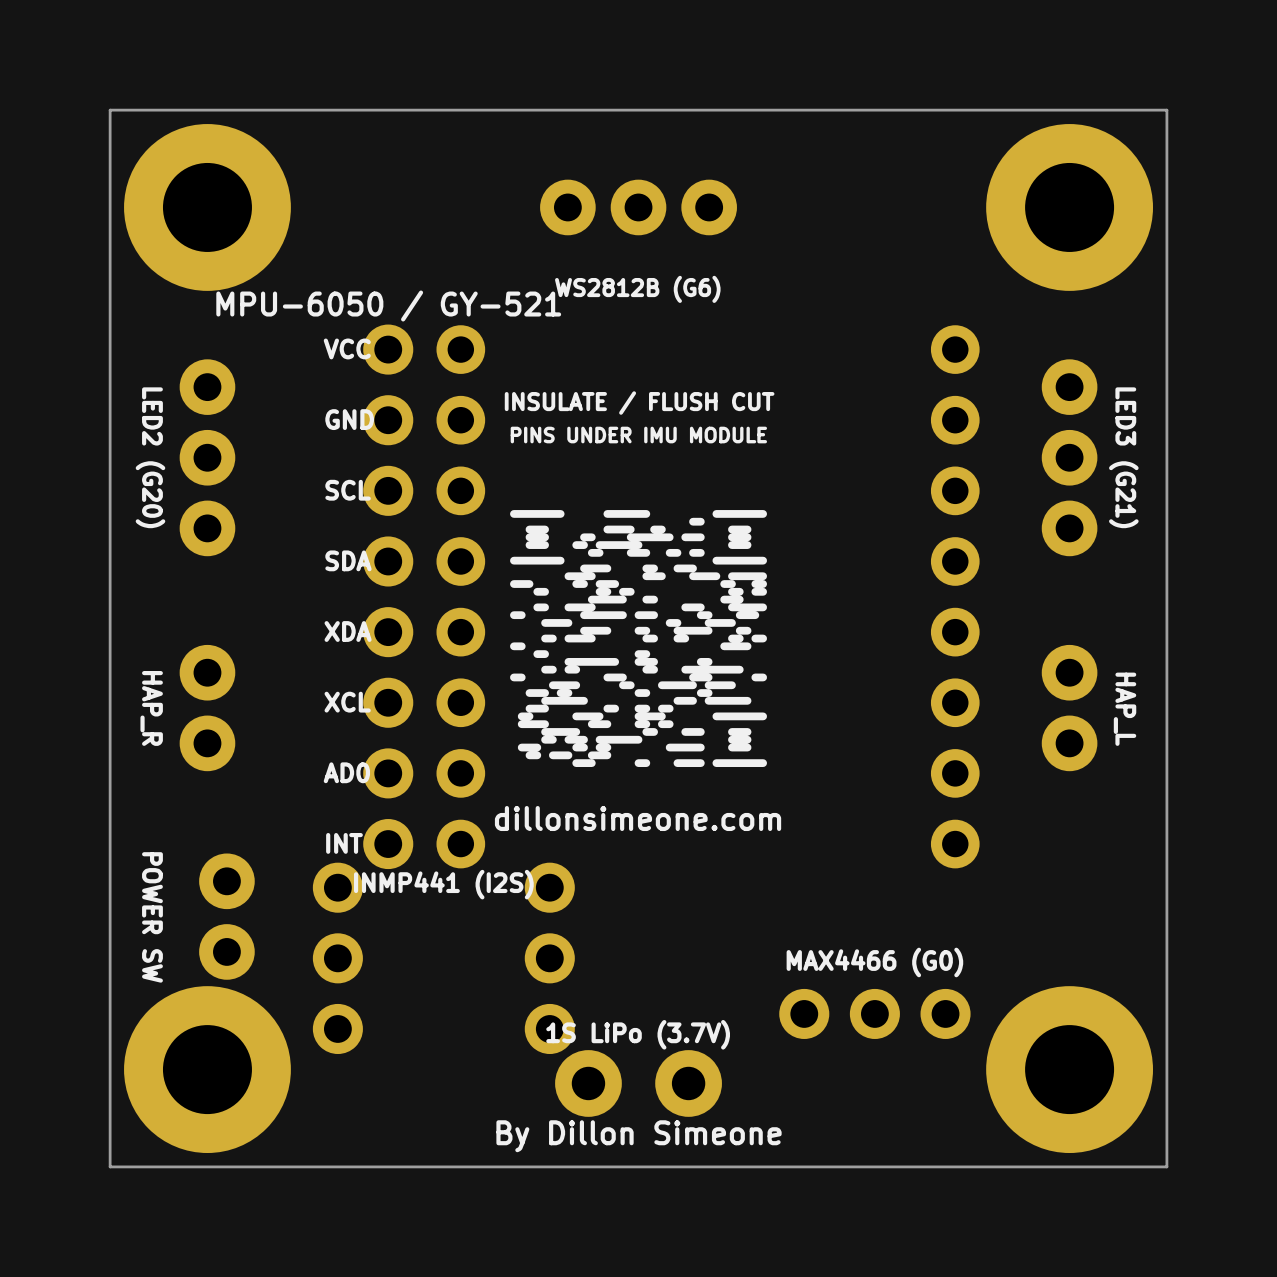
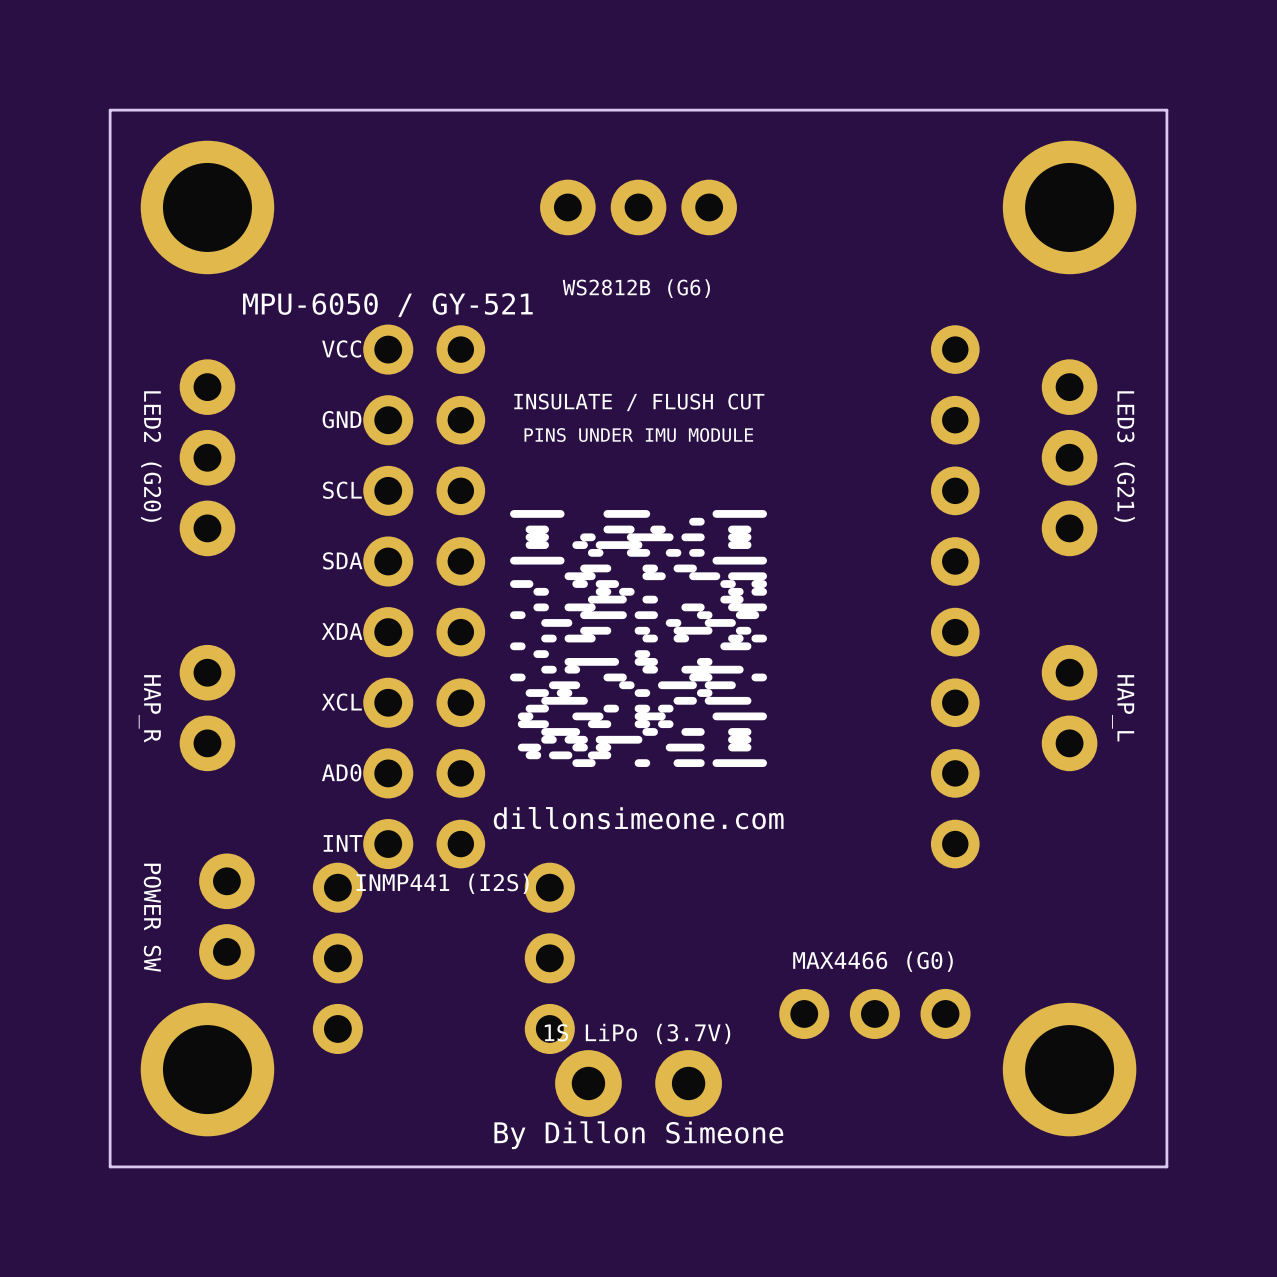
part footprint: [124, 124, 291, 291] -> [140, 140, 275, 275]
part footprint: [986, 124, 1154, 291] -> [1002, 140, 1137, 275]
part footprint: [124, 986, 291, 1154] -> [140, 1002, 275, 1137]
part footprint: [986, 986, 1154, 1154] -> [1002, 1002, 1137, 1137]

